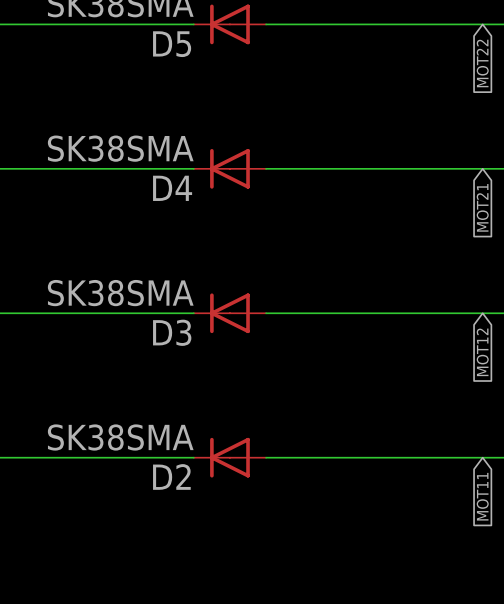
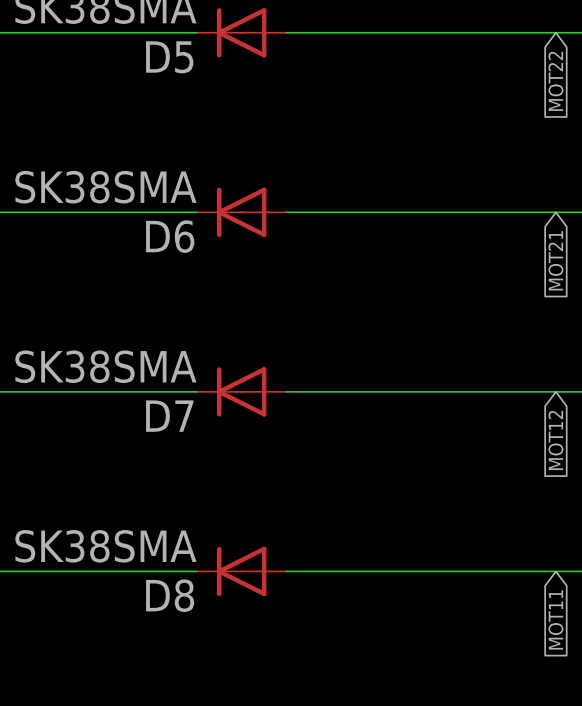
D4 name: D4 (172, 188) -> D6 (170, 236)
D3 name: D3 (172, 332) -> D7 (169, 416)
D2 name: D2 (171, 476) -> D8 (170, 595)

